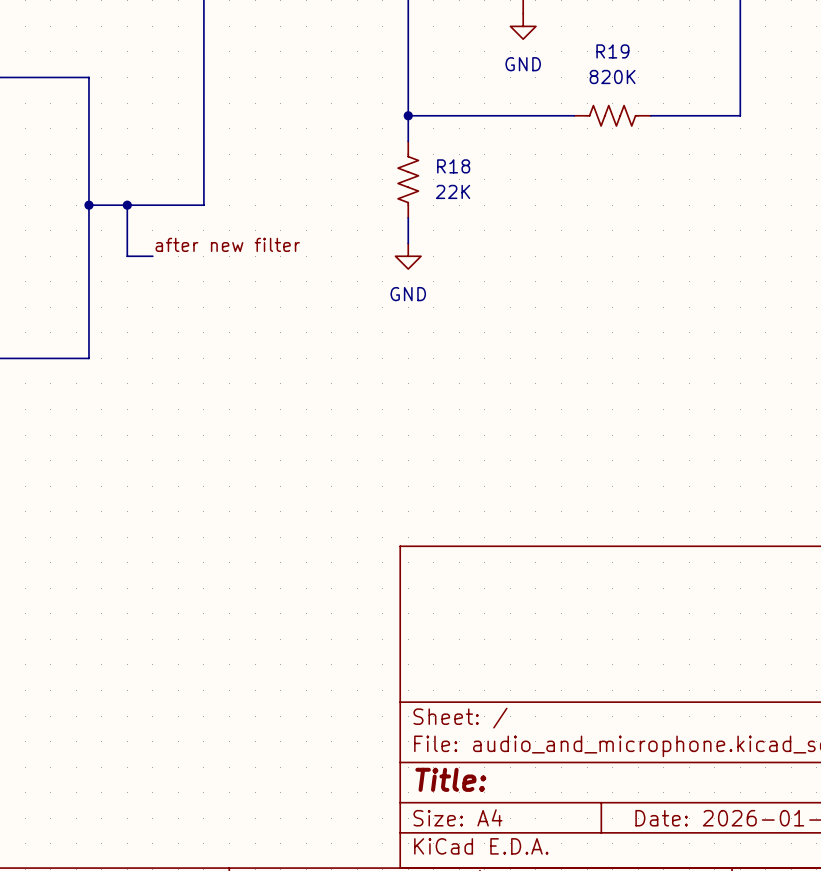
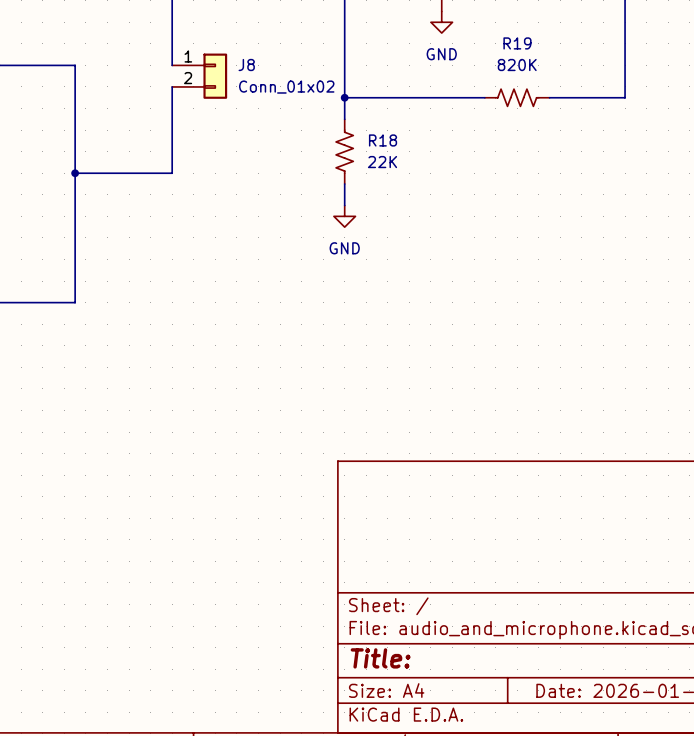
wire: (203, 77) (203, 103) -> none
J8: none -> Conn_01x02 (199, 76)
wire: (127, 205) (127, 256) (152, 256) -> none
junction: (127, 205) -> none
label: after new filter (227, 244) -> none

